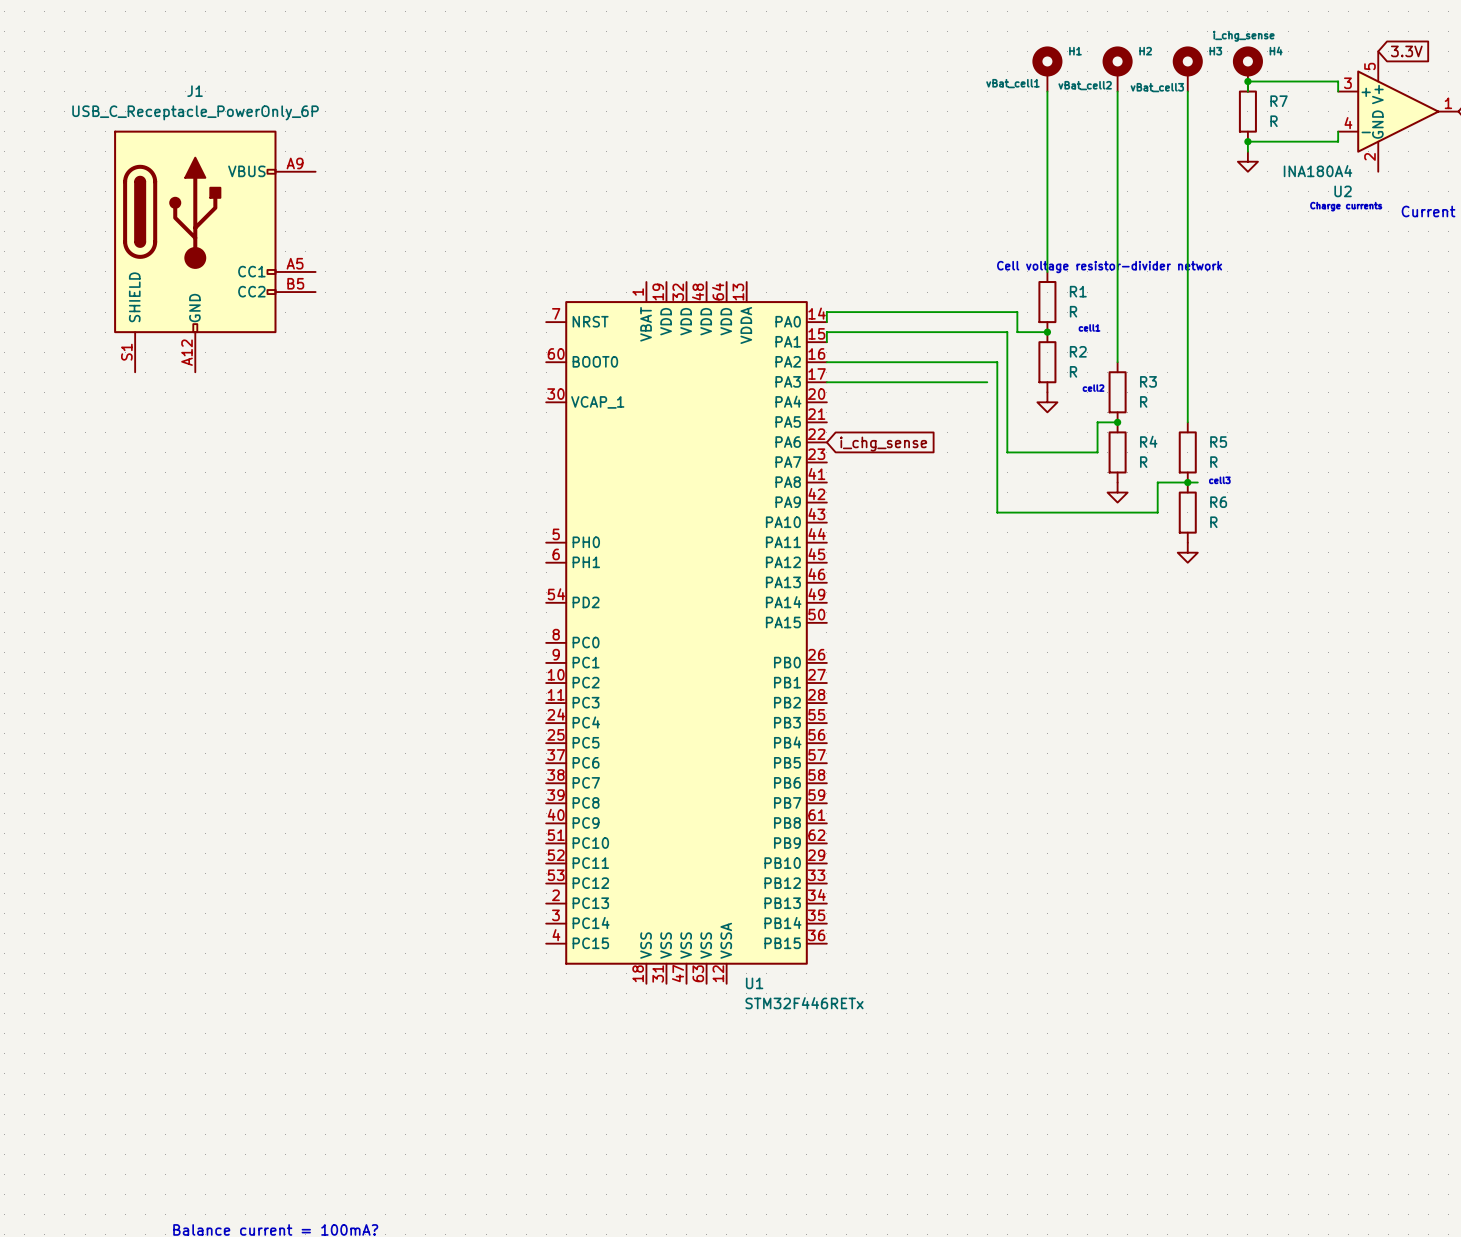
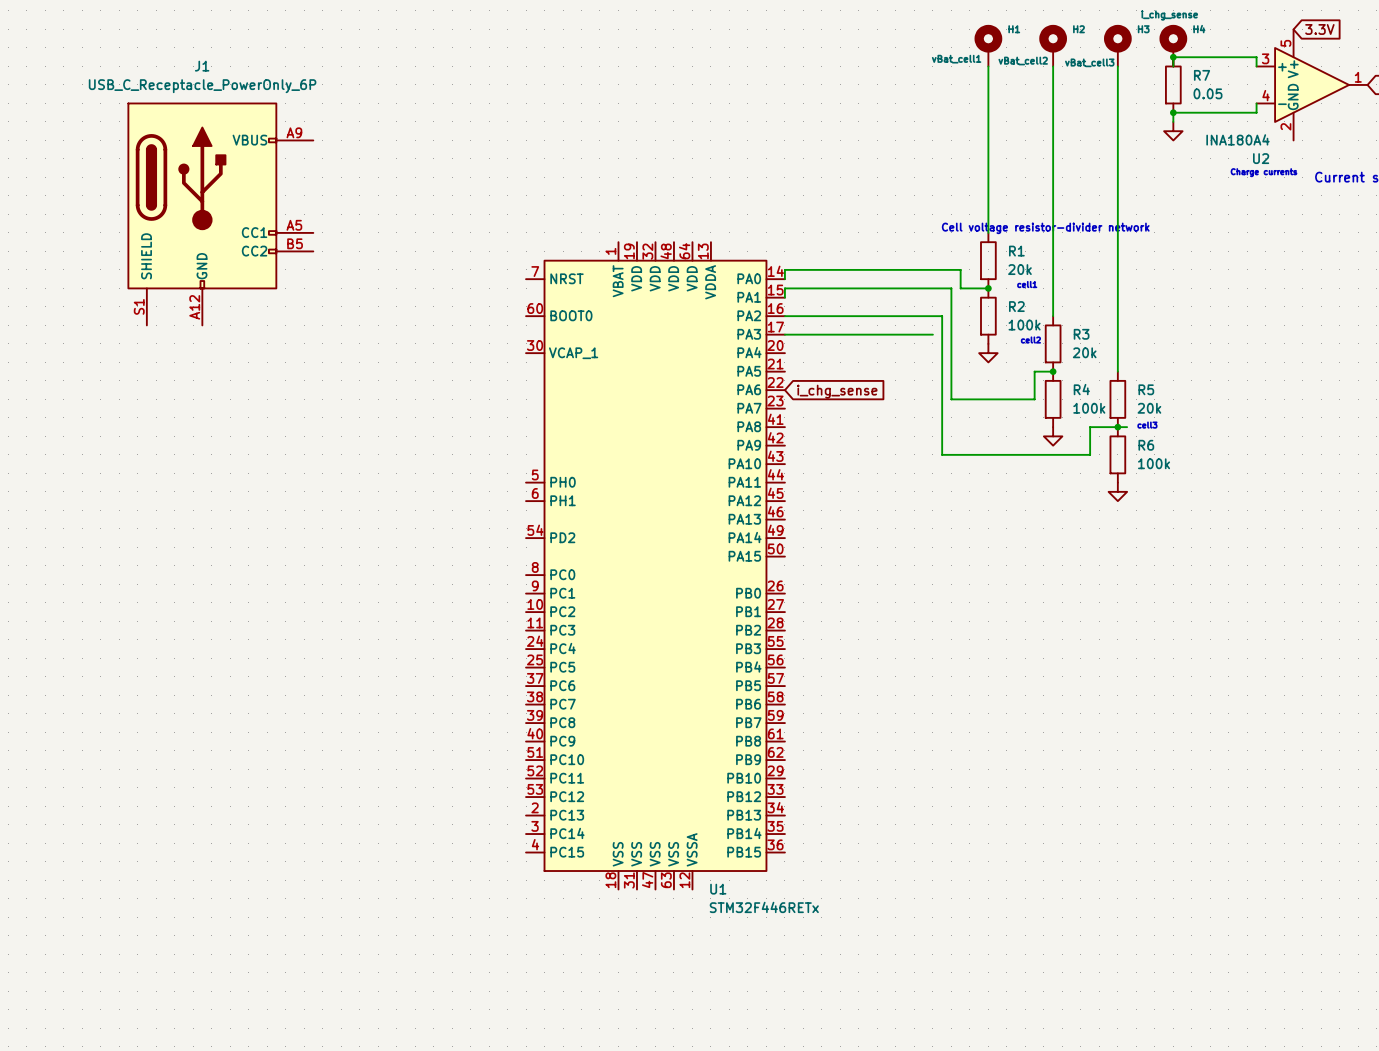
R7 value: R (1274, 121) -> 0.05 (1207, 93)
R1 value: R (1073, 311) -> 20k (1019, 269)
R2 value: R (1073, 371) -> 100k (1024, 325)
R3 value: R (1143, 401) -> 20k (1084, 352)
R4 value: R (1143, 462) -> 100k (1089, 408)
R5 value: R (1213, 462) -> 20k (1149, 408)
R6 value: R (1213, 522) -> 100k (1154, 463)

